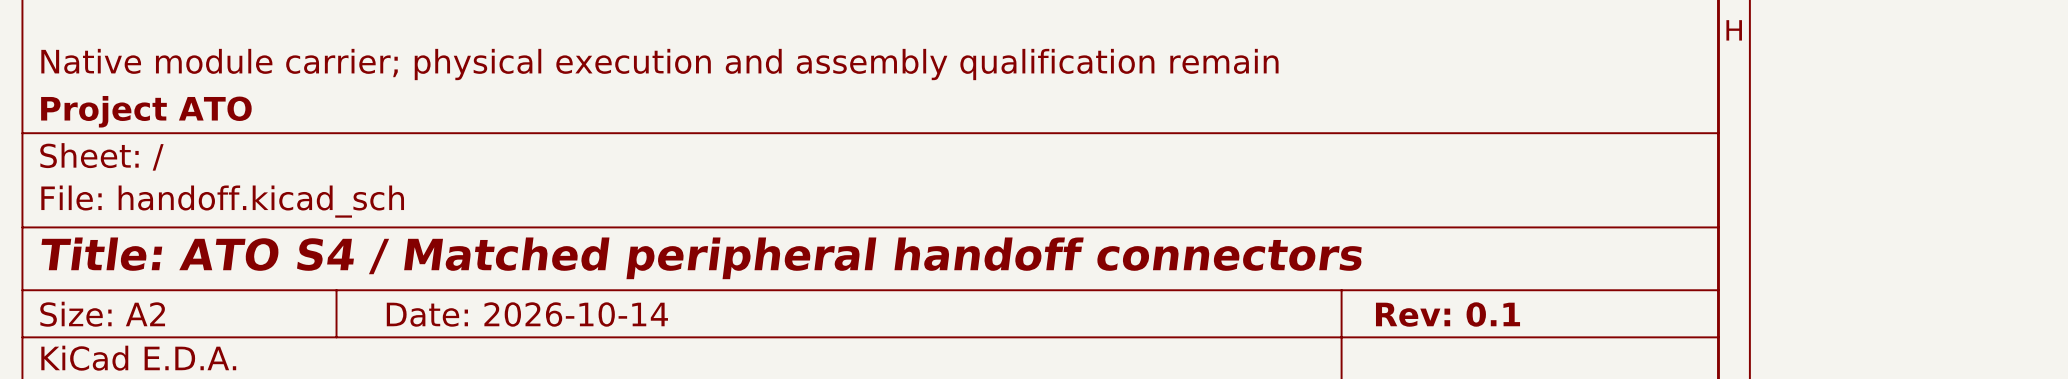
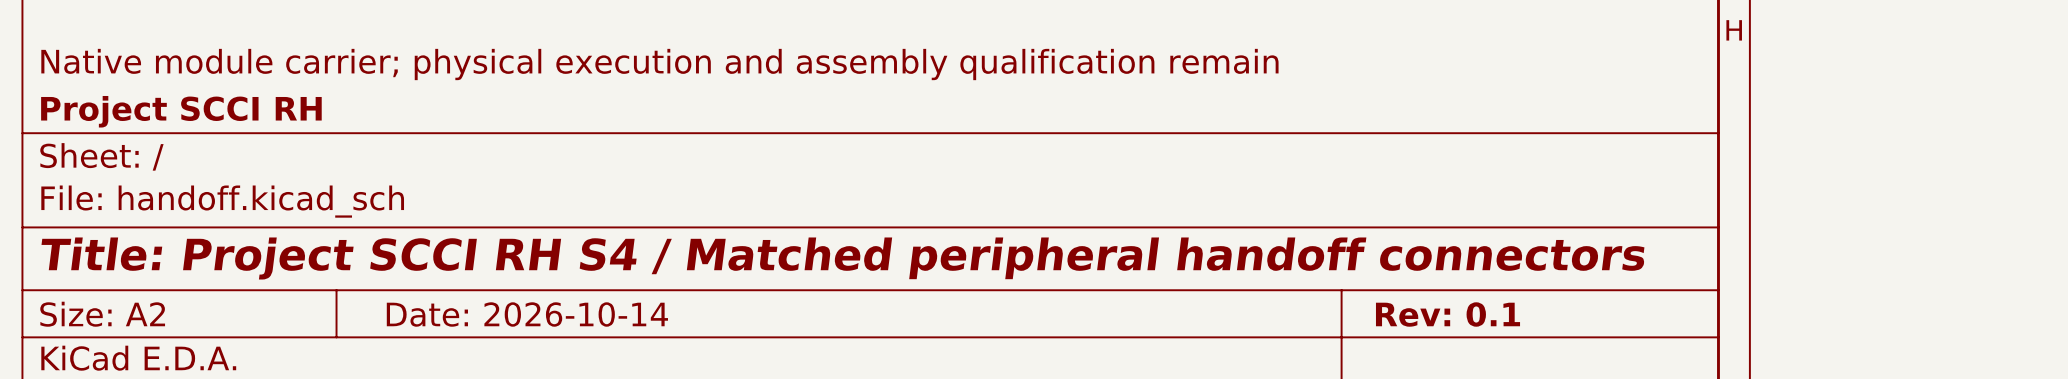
title block: Project ATO (146, 111) -> Project SCCI RH (181, 111)
title block: Title: ATO S4 / Matched peripheral handoff connectors (701, 258) -> Title: Project SCCI RH S4 / Matched peripheral handoff connectors (842, 258)

